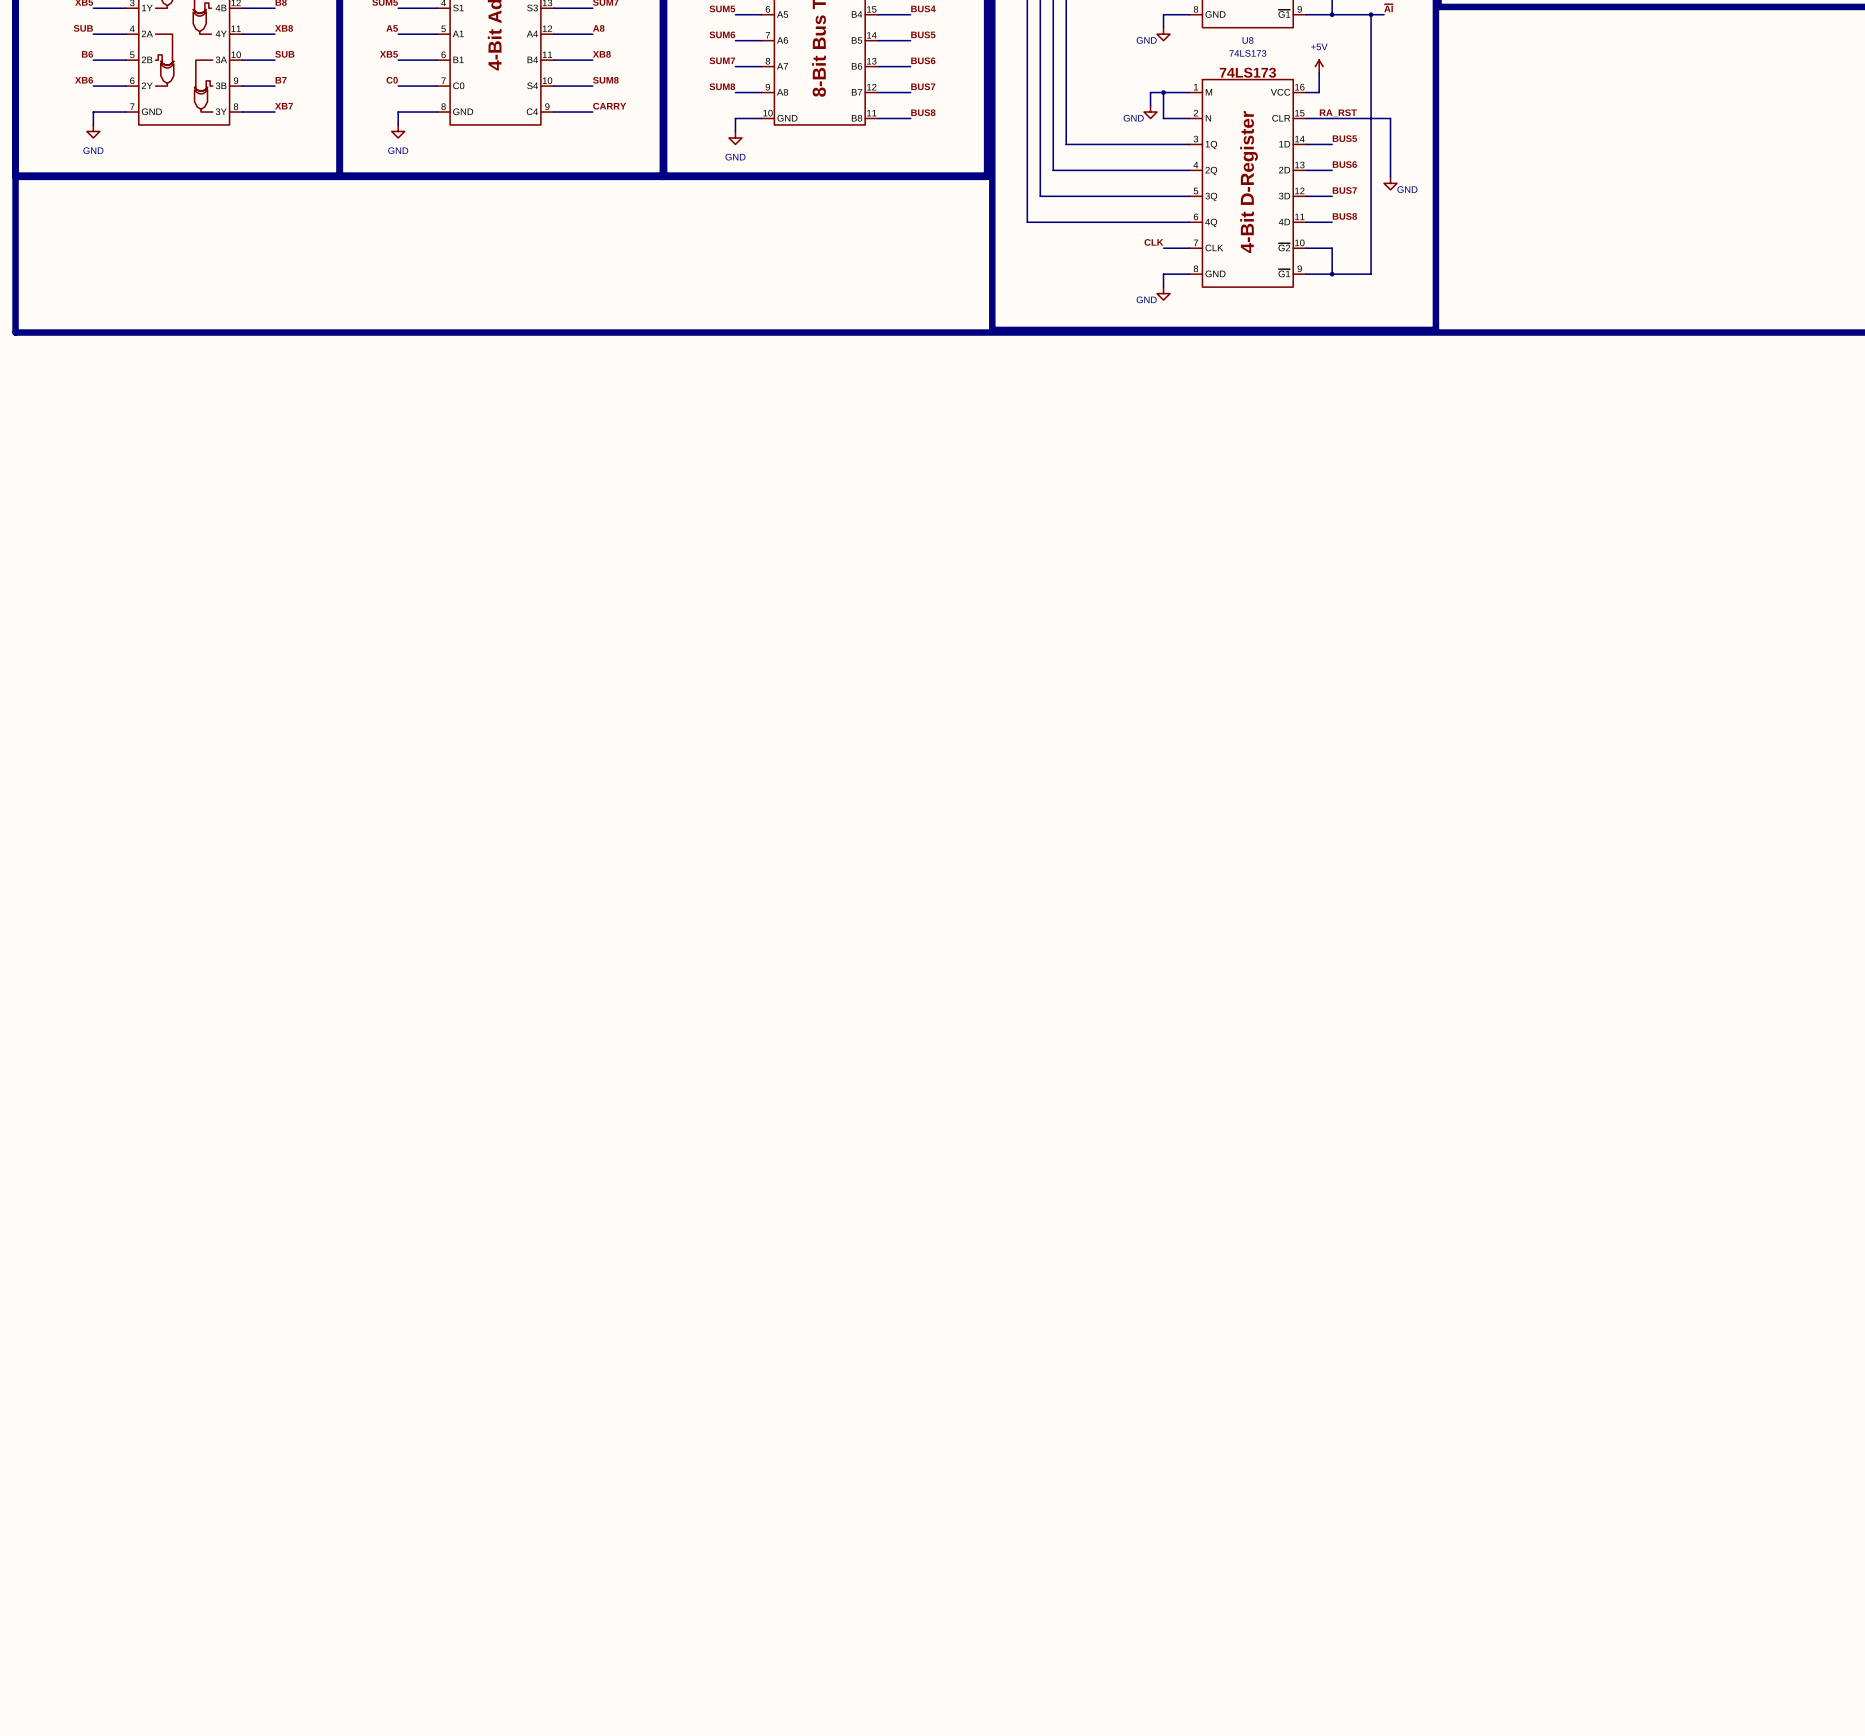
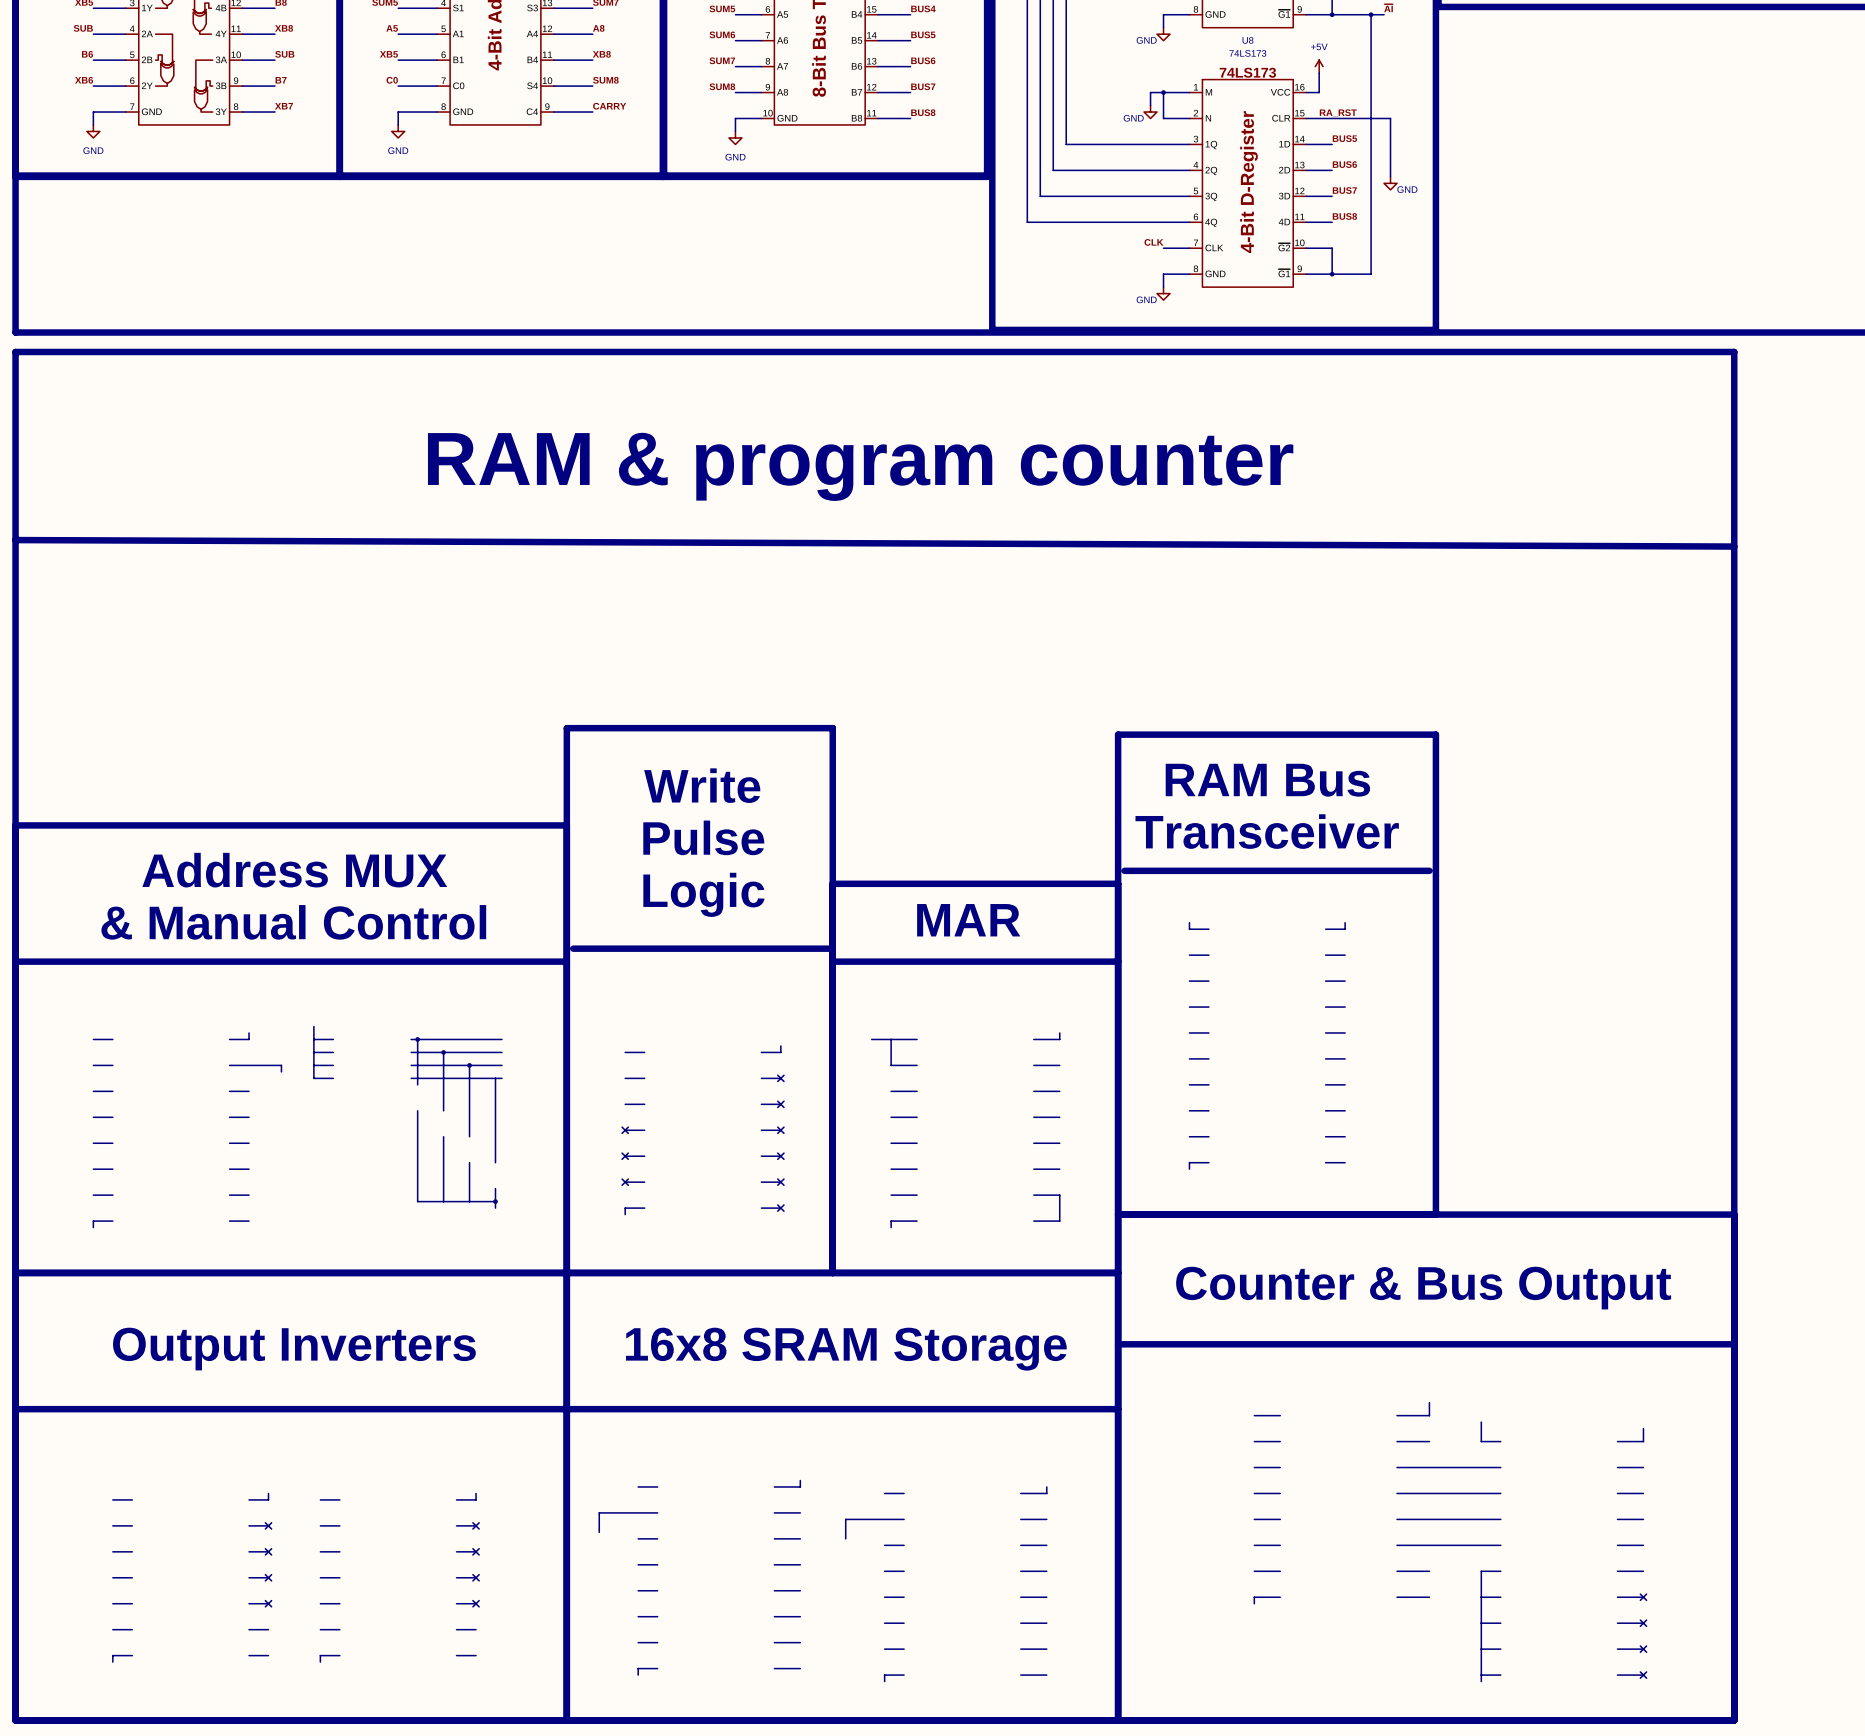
line: none -> (15, 351) (15, 1720) (1734, 1720) (1734, 351) (15, 351)
text: none -> RAM & program counter (860, 466)
line: none -> (15, 540) (1734, 546)
text: none -> RAM Bus (1267, 780)
text: none -> Write (702, 785)
line: none -> (15, 825) (566, 825)
text: none -> Transceiver (1267, 831)
text: none -> Pulse (703, 837)
text: none -> Address MUX (294, 870)
line: none -> (1124, 870) (1429, 870)
line: none -> (832, 883) (1118, 883)
text: none -> Logic (703, 894)
text: none -> MAR (968, 920)
text: none -> & Manual Control (293, 922)
wire: none -> (1189, 922) (1189, 929) (1208, 929)
wire: none -> (1345, 922) (1345, 929) (1325, 929)
line: none -> (573, 948) (832, 948)
wire: none -> (1189, 955) (1208, 955)
wire: none -> (1325, 955) (1345, 955)
line: none -> (15, 961) (566, 961)
line: none -> (832, 961) (1118, 961)
wire: none -> (1189, 981) (1208, 981)
wire: none -> (1325, 981) (1345, 981)
wire: none -> (1189, 1007) (1208, 1007)
wire: none -> (1325, 1007) (1345, 1007)
wire: none -> (313, 1026) (313, 1078) (333, 1078)
wire: none -> (249, 1032) (249, 1039) (229, 1039)
wire: none -> (1059, 1032) (1059, 1039) (1033, 1039)
wire: none -> (1189, 1032) (1208, 1032)
wire: none -> (1325, 1032) (1345, 1032)
wire: none -> (93, 1039) (112, 1039)
wire: none -> (313, 1039) (333, 1039)
wire: none -> (411, 1039) (501, 1039)
wire: none -> (417, 1039) (417, 1084)
junction: none -> (417, 1039)
wire: none -> (871, 1039) (917, 1039)
wire: none -> (891, 1039) (891, 1065) (917, 1065)
wire: none -> (780, 1045) (780, 1052) (761, 1052)
wire: none -> (313, 1052) (333, 1052)
wire: none -> (411, 1052) (501, 1052)
wire: none -> (443, 1052) (443, 1110)
junction: none -> (443, 1052)
wire: none -> (625, 1052) (644, 1052)
wire: none -> (1189, 1058) (1208, 1058)
wire: none -> (1325, 1058) (1345, 1058)
wire: none -> (93, 1065) (112, 1065)
wire: none -> (229, 1065) (281, 1065) (281, 1071)
wire: none -> (313, 1065) (333, 1065)
wire: none -> (411, 1065) (501, 1065)
wire: none -> (469, 1065) (469, 1136)
junction: none -> (469, 1065)
wire: none -> (1033, 1065) (1059, 1065)
wire: none -> (411, 1078) (501, 1078)
wire: none -> (495, 1078) (495, 1162)
wire: none -> (625, 1078) (644, 1078)
wire: none -> (761, 1078) (780, 1078)
no-connect mark: none -> (780, 1078)
wire: none -> (1189, 1084) (1208, 1084)
wire: none -> (1325, 1084) (1345, 1084)
wire: none -> (93, 1091) (112, 1091)
wire: none -> (229, 1091) (249, 1091)
wire: none -> (891, 1091) (917, 1091)
wire: none -> (1033, 1091) (1059, 1091)
wire: none -> (625, 1104) (644, 1104)
wire: none -> (761, 1104) (780, 1104)
no-connect mark: none -> (780, 1104)
wire: none -> (417, 1110) (417, 1201) (495, 1201)
wire: none -> (1189, 1110) (1208, 1110)
wire: none -> (1325, 1110) (1345, 1110)
wire: none -> (93, 1117) (112, 1117)
wire: none -> (229, 1117) (249, 1117)
wire: none -> (891, 1117) (917, 1117)
wire: none -> (1033, 1117) (1059, 1117)
wire: none -> (625, 1130) (644, 1130)
no-connect mark: none -> (625, 1130)
wire: none -> (761, 1130) (780, 1130)
no-connect mark: none -> (780, 1130)
wire: none -> (443, 1136) (443, 1201)
wire: none -> (1189, 1136) (1208, 1136)
wire: none -> (1325, 1136) (1345, 1136)
wire: none -> (93, 1143) (112, 1143)
wire: none -> (229, 1143) (249, 1143)
wire: none -> (891, 1143) (917, 1143)
wire: none -> (1033, 1143) (1059, 1143)
wire: none -> (625, 1156) (644, 1156)
no-connect mark: none -> (625, 1156)
wire: none -> (761, 1156) (780, 1156)
no-connect mark: none -> (780, 1156)
wire: none -> (469, 1162) (469, 1201)
wire: none -> (1208, 1162) (1189, 1162) (1189, 1169)
wire: none -> (1325, 1162) (1345, 1162)
wire: none -> (93, 1169) (112, 1169)
wire: none -> (229, 1169) (249, 1169)
wire: none -> (891, 1169) (917, 1169)
wire: none -> (1033, 1169) (1059, 1169)
wire: none -> (625, 1182) (644, 1182)
no-connect mark: none -> (625, 1182)
wire: none -> (761, 1182) (780, 1182)
no-connect mark: none -> (780, 1182)
wire: none -> (495, 1188) (495, 1208)
wire: none -> (93, 1195) (112, 1195)
wire: none -> (229, 1195) (249, 1195)
wire: none -> (891, 1195) (917, 1195)
wire: none -> (1033, 1195) (1059, 1195) (1059, 1221) (1033, 1221)
junction: none -> (495, 1201)
wire: none -> (644, 1208) (625, 1208) (625, 1214)
wire: none -> (761, 1208) (780, 1208)
no-connect mark: none -> (780, 1208)
line: none -> (1118, 1214) (1734, 1214)
line: none -> (1435, 1214) (1435, 734) (1118, 734) (1118, 1720)
wire: none -> (112, 1221) (93, 1221) (93, 1227)
wire: none -> (229, 1221) (249, 1221)
wire: none -> (917, 1221) (891, 1221) (891, 1227)
line: none -> (15, 1272) (1118, 1272)
line: none -> (832, 1272) (832, 728) (566, 728) (566, 1720)
text: none -> Counter & Bus Output (1423, 1288)
line: none -> (1118, 1344) (1734, 1344)
text: none -> Output Inverters (294, 1349)
text: none -> 16x8 SRAM Storage (846, 1349)
wire: none -> (1429, 1402) (1429, 1415) (1397, 1415)
line: none -> (15, 1409) (1118, 1409)
wire: none -> (1254, 1415) (1280, 1415)
wire: none -> (1481, 1422) (1481, 1441) (1500, 1441)
wire: none -> (1643, 1428) (1643, 1441) (1617, 1441)
wire: none -> (1254, 1441) (1280, 1441)
wire: none -> (1397, 1441) (1429, 1441)
wire: none -> (1254, 1467) (1280, 1467)
wire: none -> (1397, 1467) (1500, 1467)
wire: none -> (1617, 1467) (1643, 1467)
wire: none -> (800, 1480) (800, 1486) (774, 1486)
wire: none -> (638, 1486) (657, 1486)
wire: none -> (1046, 1486) (1046, 1493) (1020, 1493)
wire: none -> (268, 1493) (268, 1499) (249, 1499)
wire: none -> (476, 1493) (476, 1499) (456, 1499)
wire: none -> (884, 1493) (904, 1493)
wire: none -> (1254, 1493) (1280, 1493)
wire: none -> (1397, 1493) (1500, 1493)
wire: none -> (1617, 1493) (1643, 1493)
wire: none -> (112, 1499) (132, 1499)
wire: none -> (320, 1499) (339, 1499)
wire: none -> (657, 1512) (599, 1512) (599, 1532)
wire: none -> (774, 1512) (800, 1512)
wire: none -> (904, 1519) (845, 1519) (845, 1538)
wire: none -> (1020, 1519) (1046, 1519)
wire: none -> (1254, 1519) (1280, 1519)
wire: none -> (1397, 1519) (1500, 1519)
wire: none -> (1617, 1519) (1643, 1519)
wire: none -> (112, 1525) (132, 1525)
wire: none -> (249, 1525) (268, 1525)
no-connect mark: none -> (268, 1525)
wire: none -> (320, 1525) (339, 1525)
wire: none -> (456, 1525) (476, 1525)
no-connect mark: none -> (476, 1525)
wire: none -> (638, 1538) (657, 1538)
wire: none -> (774, 1538) (800, 1538)
wire: none -> (884, 1545) (904, 1545)
wire: none -> (1020, 1545) (1046, 1545)
wire: none -> (1254, 1545) (1280, 1545)
wire: none -> (1397, 1545) (1500, 1545)
wire: none -> (1617, 1545) (1643, 1545)
wire: none -> (112, 1551) (132, 1551)
wire: none -> (249, 1551) (268, 1551)
no-connect mark: none -> (268, 1551)
wire: none -> (320, 1551) (339, 1551)
wire: none -> (456, 1551) (476, 1551)
no-connect mark: none -> (476, 1551)
wire: none -> (638, 1564) (657, 1564)
wire: none -> (774, 1564) (800, 1564)
wire: none -> (884, 1571) (904, 1571)
wire: none -> (1020, 1571) (1046, 1571)
wire: none -> (1254, 1571) (1280, 1571)
wire: none -> (1397, 1571) (1429, 1571)
wire: none -> (1500, 1571) (1481, 1571) (1481, 1681)
wire: none -> (1617, 1571) (1643, 1571)
wire: none -> (112, 1577) (132, 1577)
wire: none -> (249, 1577) (268, 1577)
no-connect mark: none -> (268, 1577)
wire: none -> (320, 1577) (339, 1577)
wire: none -> (456, 1577) (476, 1577)
no-connect mark: none -> (476, 1577)
wire: none -> (638, 1590) (657, 1590)
wire: none -> (774, 1590) (800, 1590)
wire: none -> (884, 1597) (904, 1597)
wire: none -> (1020, 1597) (1046, 1597)
wire: none -> (1280, 1597) (1254, 1597) (1254, 1603)
wire: none -> (1397, 1597) (1429, 1597)
wire: none -> (1481, 1597) (1500, 1597)
wire: none -> (1617, 1597) (1643, 1597)
no-connect mark: none -> (1643, 1597)
wire: none -> (112, 1603) (132, 1603)
wire: none -> (249, 1603) (268, 1603)
no-connect mark: none -> (268, 1603)
wire: none -> (320, 1603) (339, 1603)
wire: none -> (456, 1603) (476, 1603)
no-connect mark: none -> (476, 1603)
wire: none -> (638, 1616) (657, 1616)
wire: none -> (774, 1616) (800, 1616)
wire: none -> (884, 1623) (904, 1623)
wire: none -> (1020, 1623) (1046, 1623)
wire: none -> (1481, 1623) (1500, 1623)
wire: none -> (1617, 1623) (1643, 1623)
no-connect mark: none -> (1643, 1623)
wire: none -> (112, 1629) (132, 1629)
wire: none -> (249, 1629) (268, 1629)
wire: none -> (320, 1629) (339, 1629)
wire: none -> (456, 1629) (476, 1629)
wire: none -> (638, 1642) (657, 1642)
wire: none -> (774, 1642) (800, 1642)
wire: none -> (884, 1649) (904, 1649)
wire: none -> (1020, 1649) (1046, 1649)
wire: none -> (1481, 1649) (1500, 1649)
wire: none -> (1617, 1649) (1643, 1649)
no-connect mark: none -> (1643, 1649)
wire: none -> (132, 1655) (112, 1655) (112, 1662)
wire: none -> (249, 1655) (268, 1655)
wire: none -> (339, 1655) (320, 1655) (320, 1662)
wire: none -> (456, 1655) (476, 1655)
wire: none -> (657, 1668) (638, 1668) (638, 1675)
wire: none -> (774, 1668) (800, 1668)
wire: none -> (904, 1675) (884, 1675) (884, 1681)
wire: none -> (1020, 1675) (1046, 1675)
wire: none -> (1481, 1675) (1500, 1675)
wire: none -> (1617, 1675) (1643, 1675)
no-connect mark: none -> (1643, 1675)

